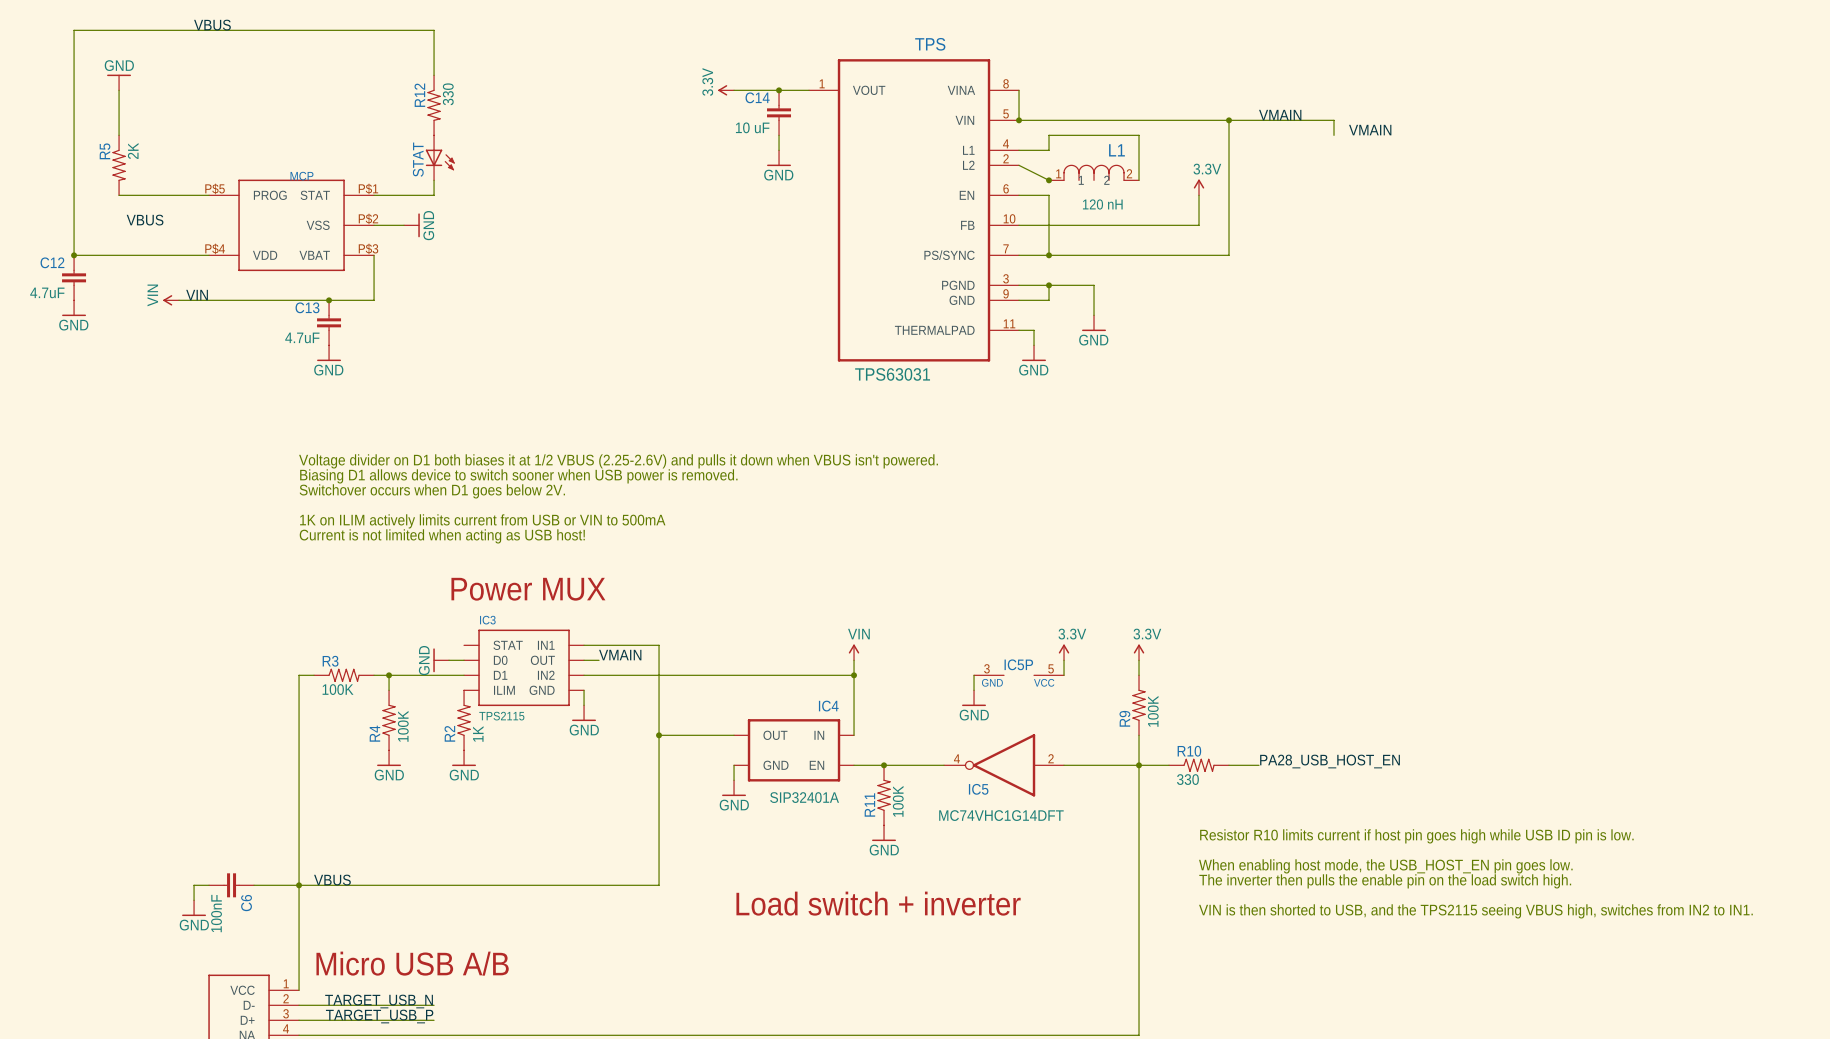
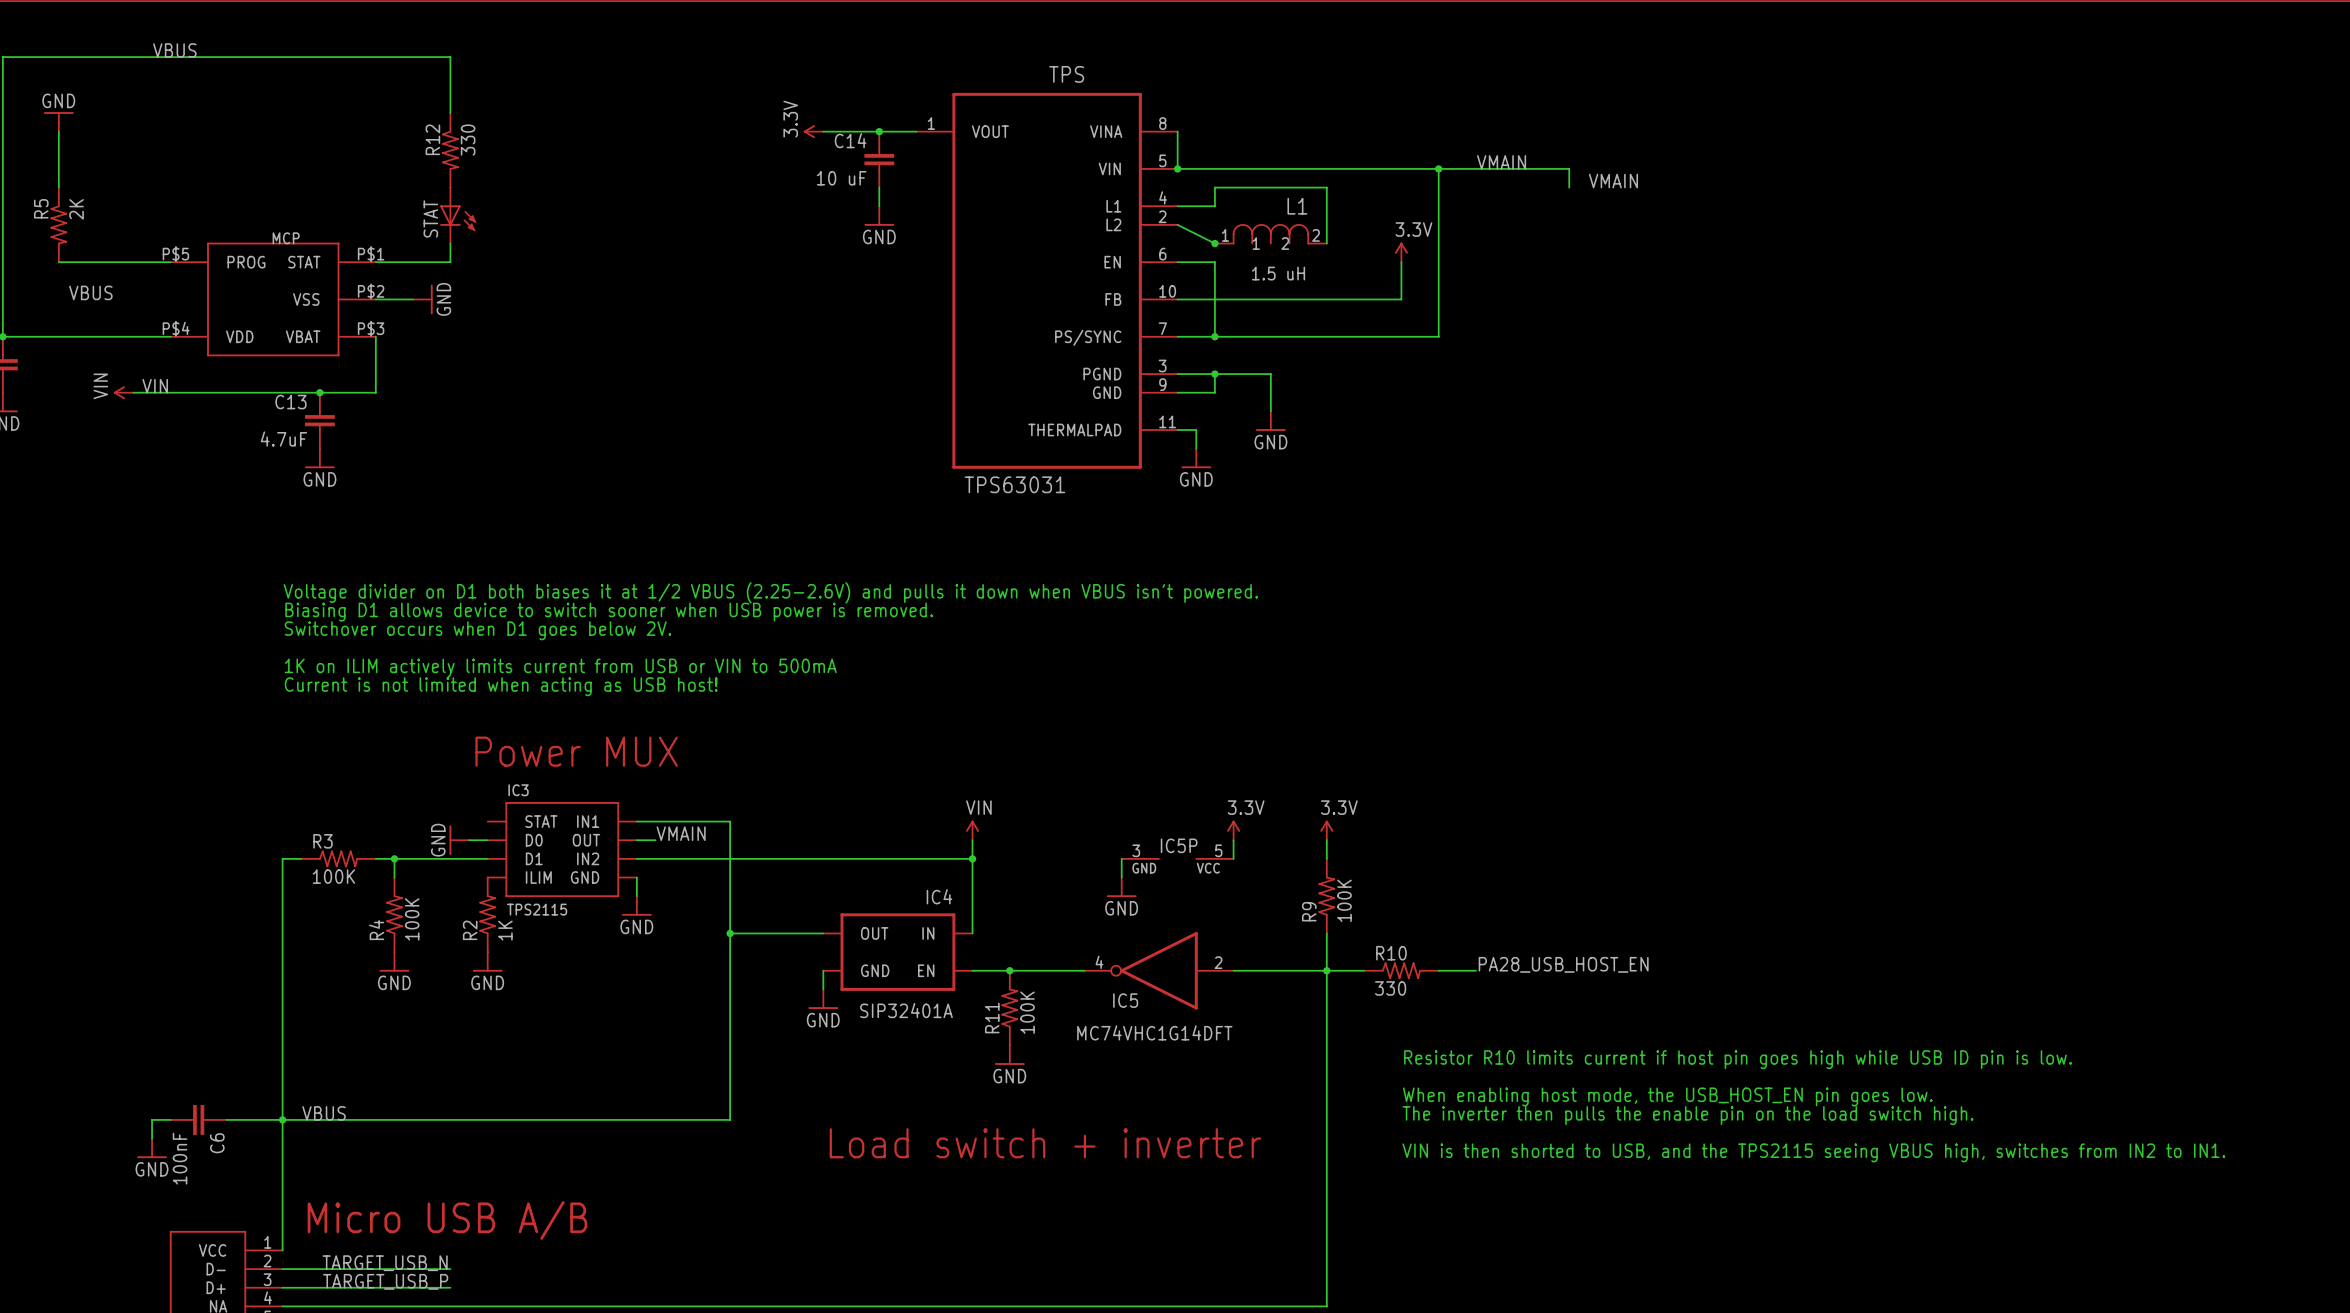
L1 value: 120 nH (1102, 204) -> 1.5 uH (1278, 273)

